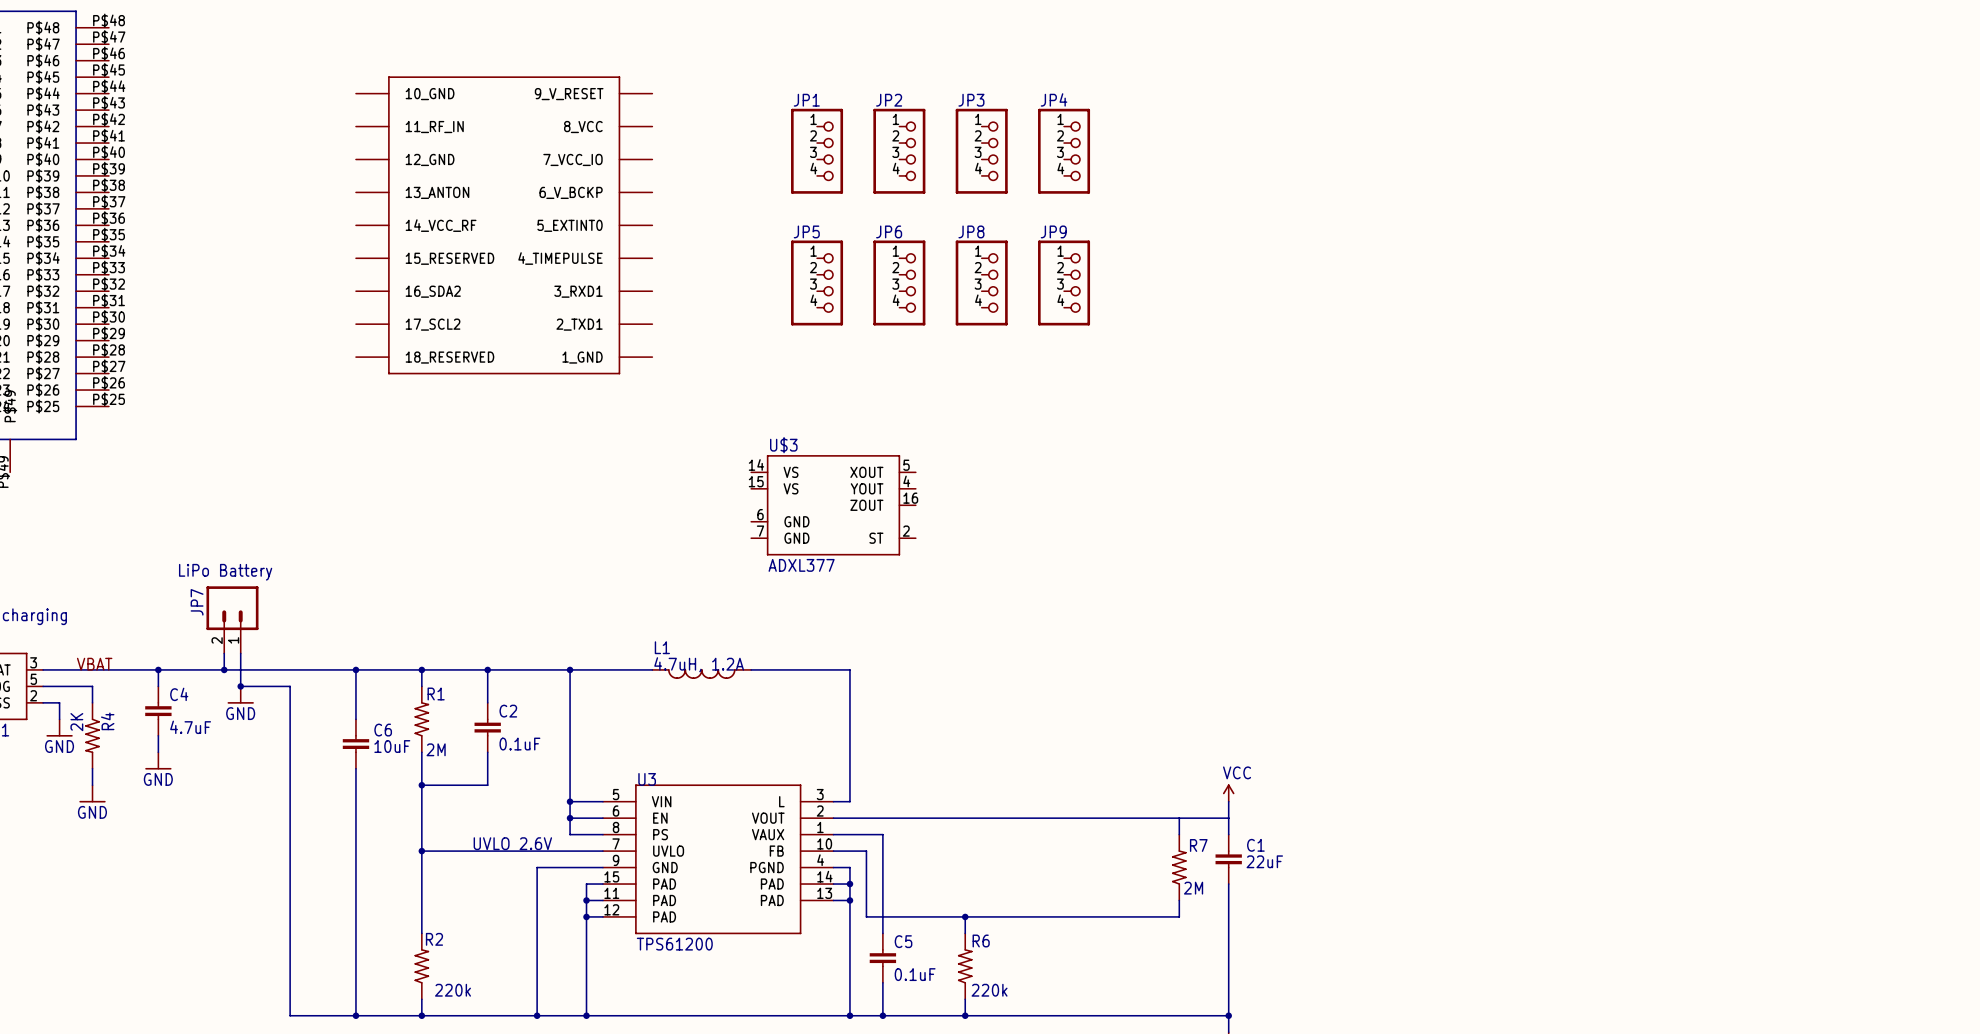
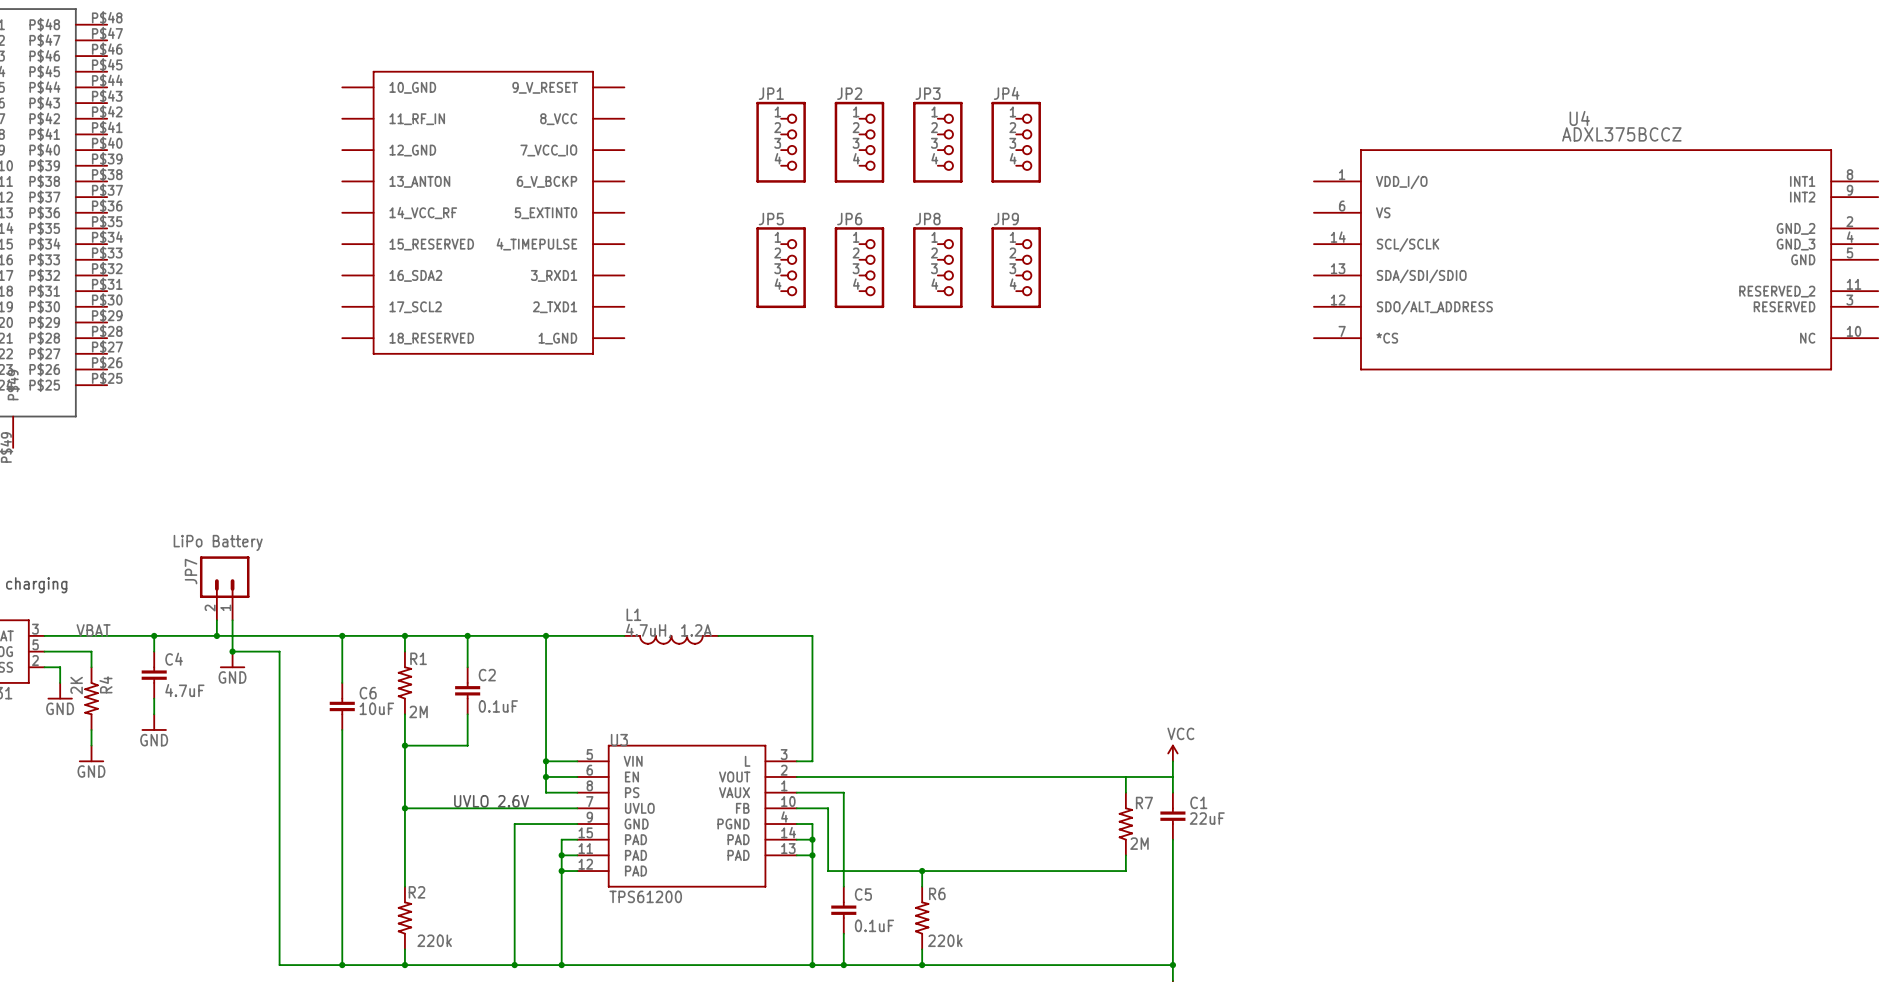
U4: none -> ADXL375BCCZ (1596, 259)
U$3: ADXL377 (833, 505) -> none

